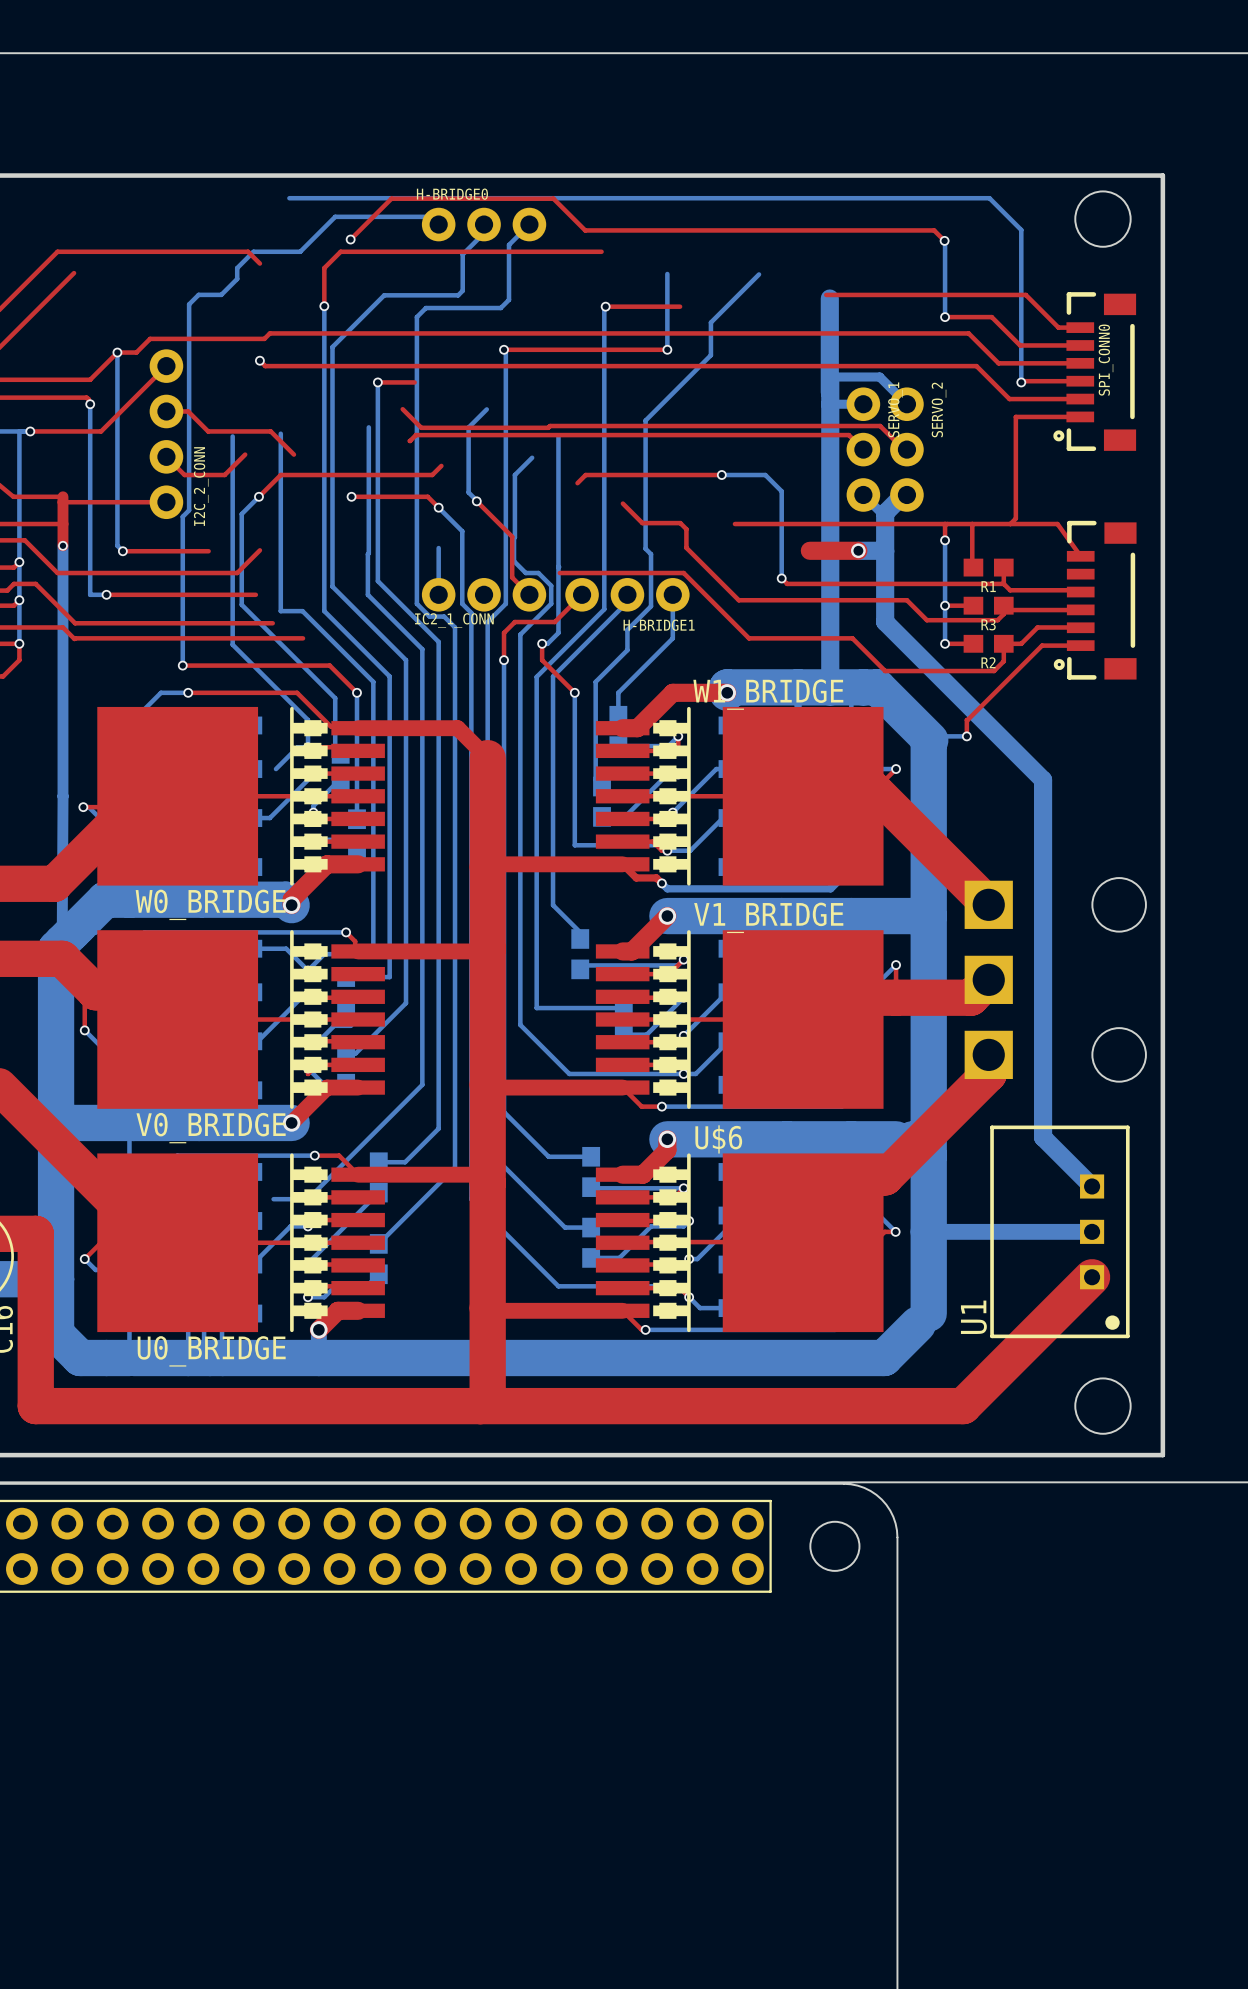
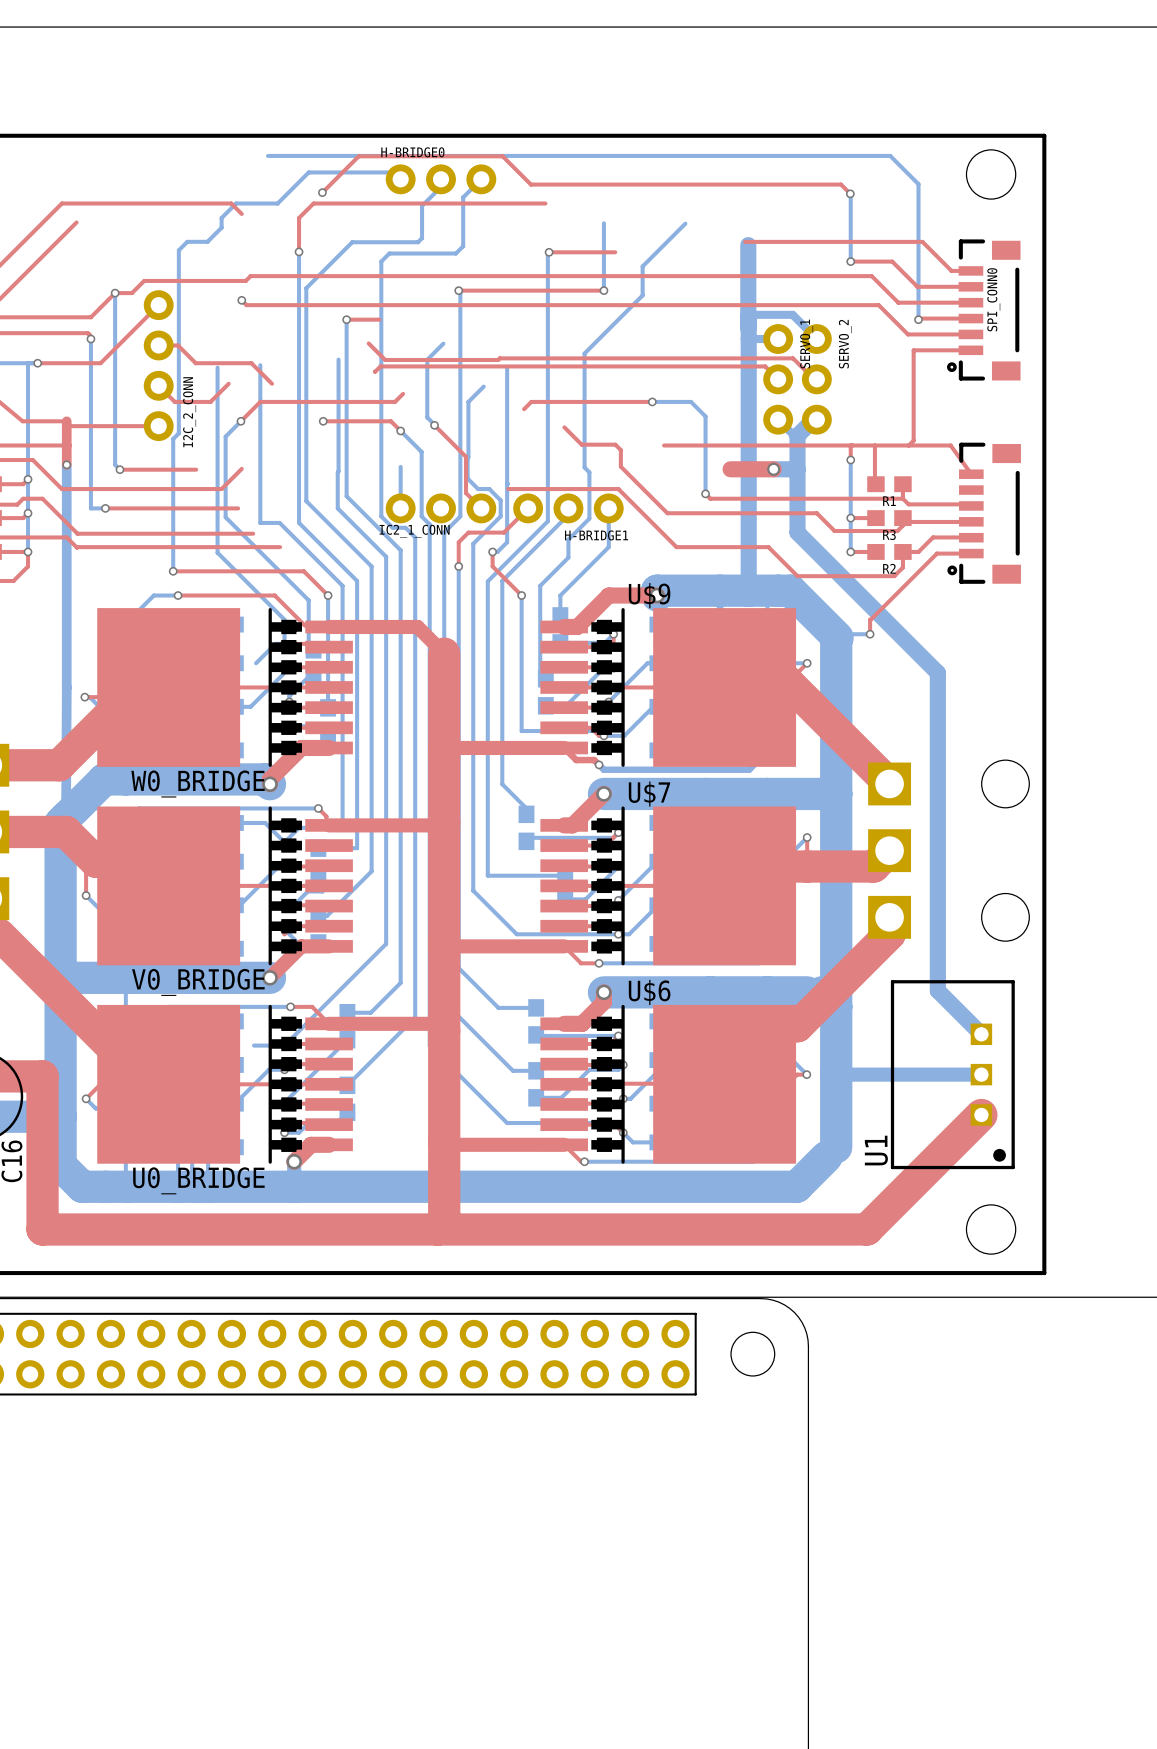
W1_BRIDGE name: W1_BRIDGE (768, 694) -> U$9 (649, 595)
V1_BRIDGE name: V1_BRIDGE (768, 917) -> U$7 (649, 794)

